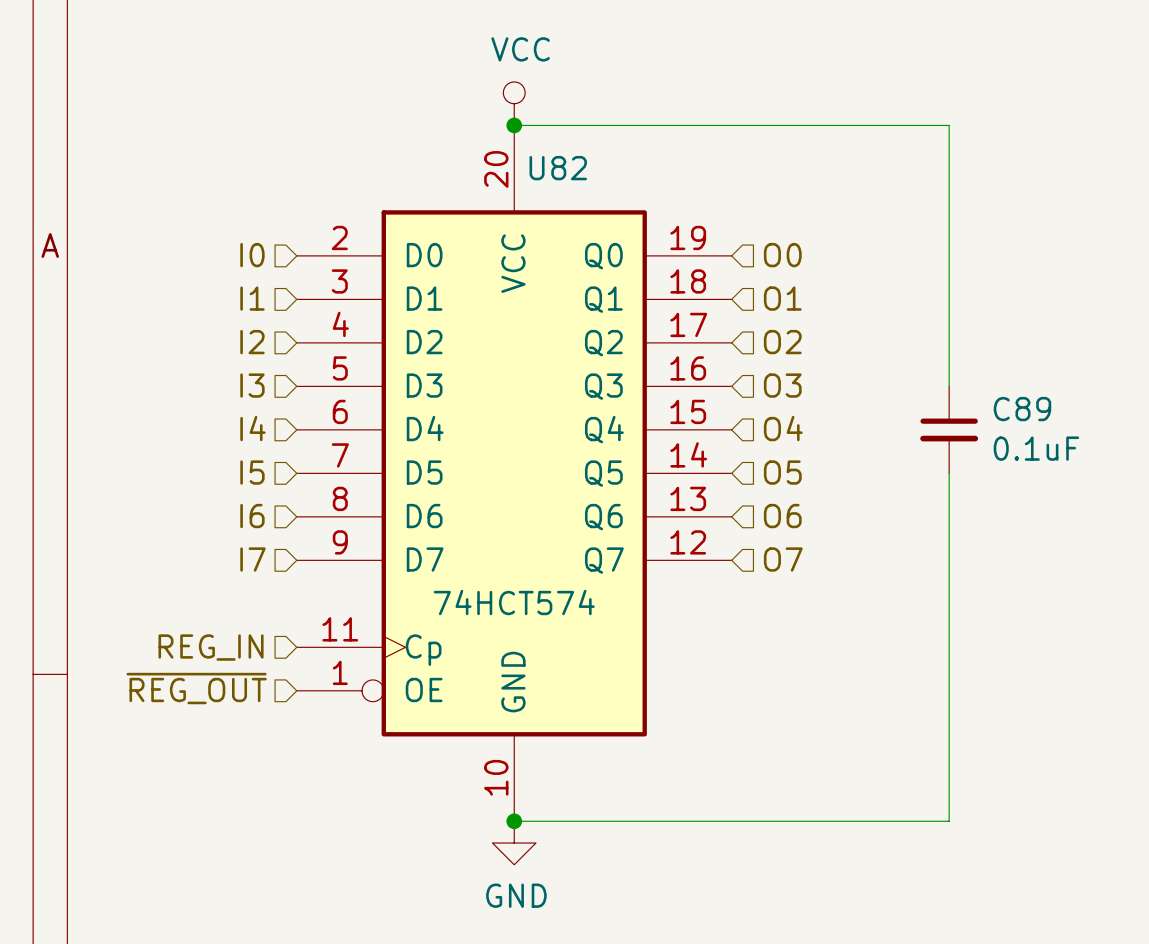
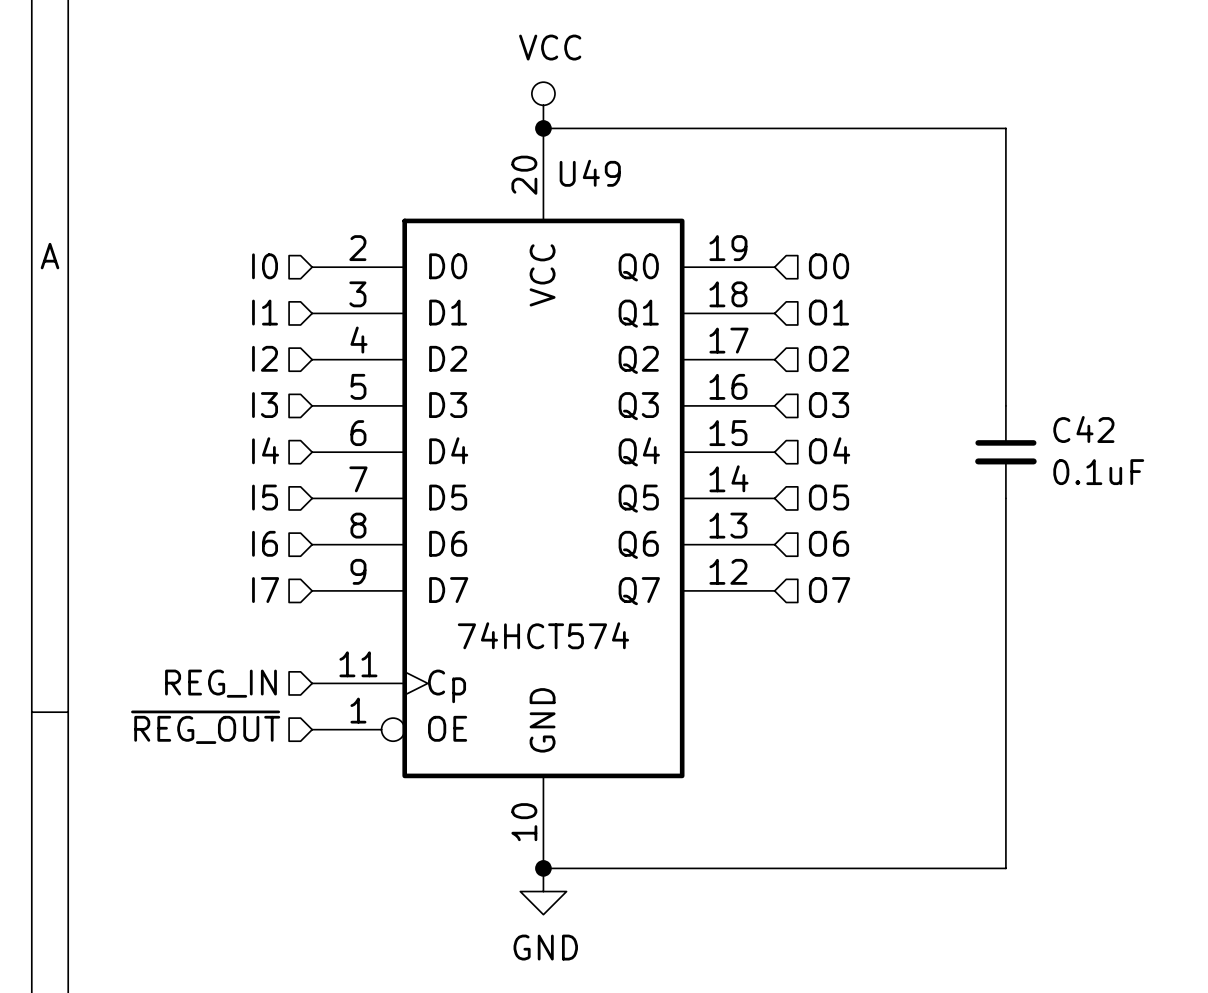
U82 name: U82 (558, 168) -> U49 (590, 173)
C89 name: C89 (1022, 409) -> C42 (1083, 429)

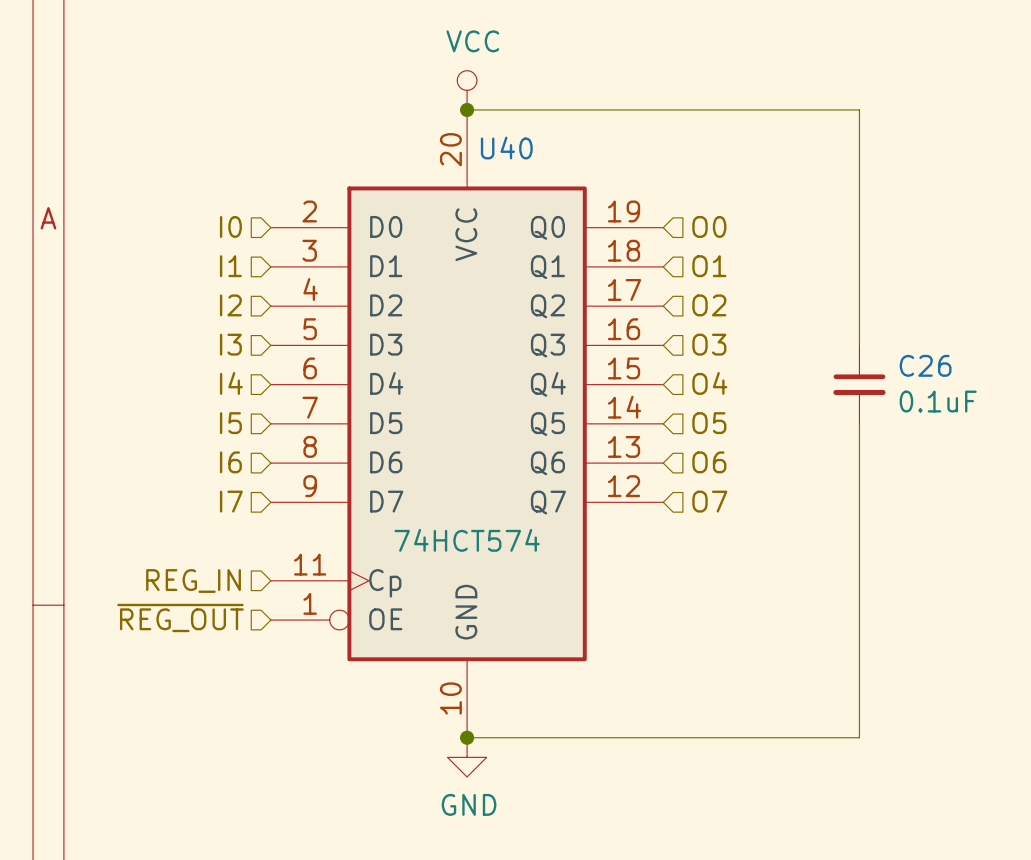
U49 name: U49 (590, 173) -> U40 (506, 148)
C42 name: C42 (1083, 429) -> C26 (925, 365)

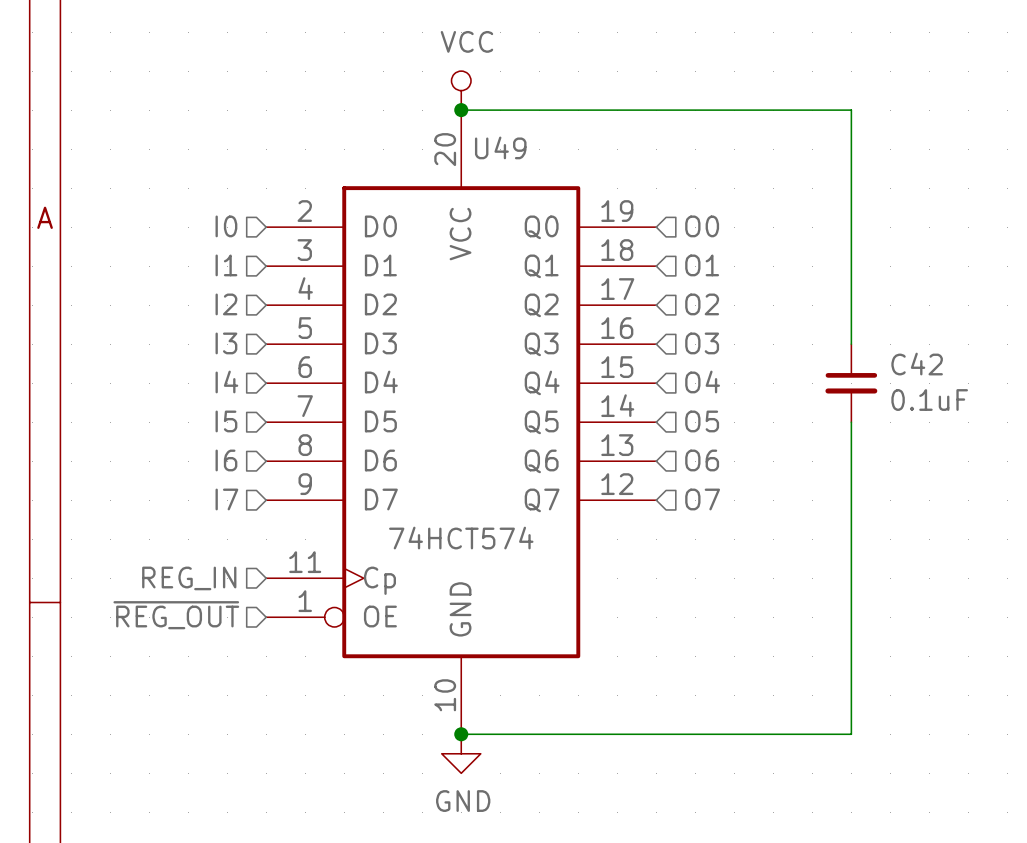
U40 name: U40 (506, 148) -> U49 (500, 147)
C26 name: C26 (925, 365) -> C42 (917, 364)

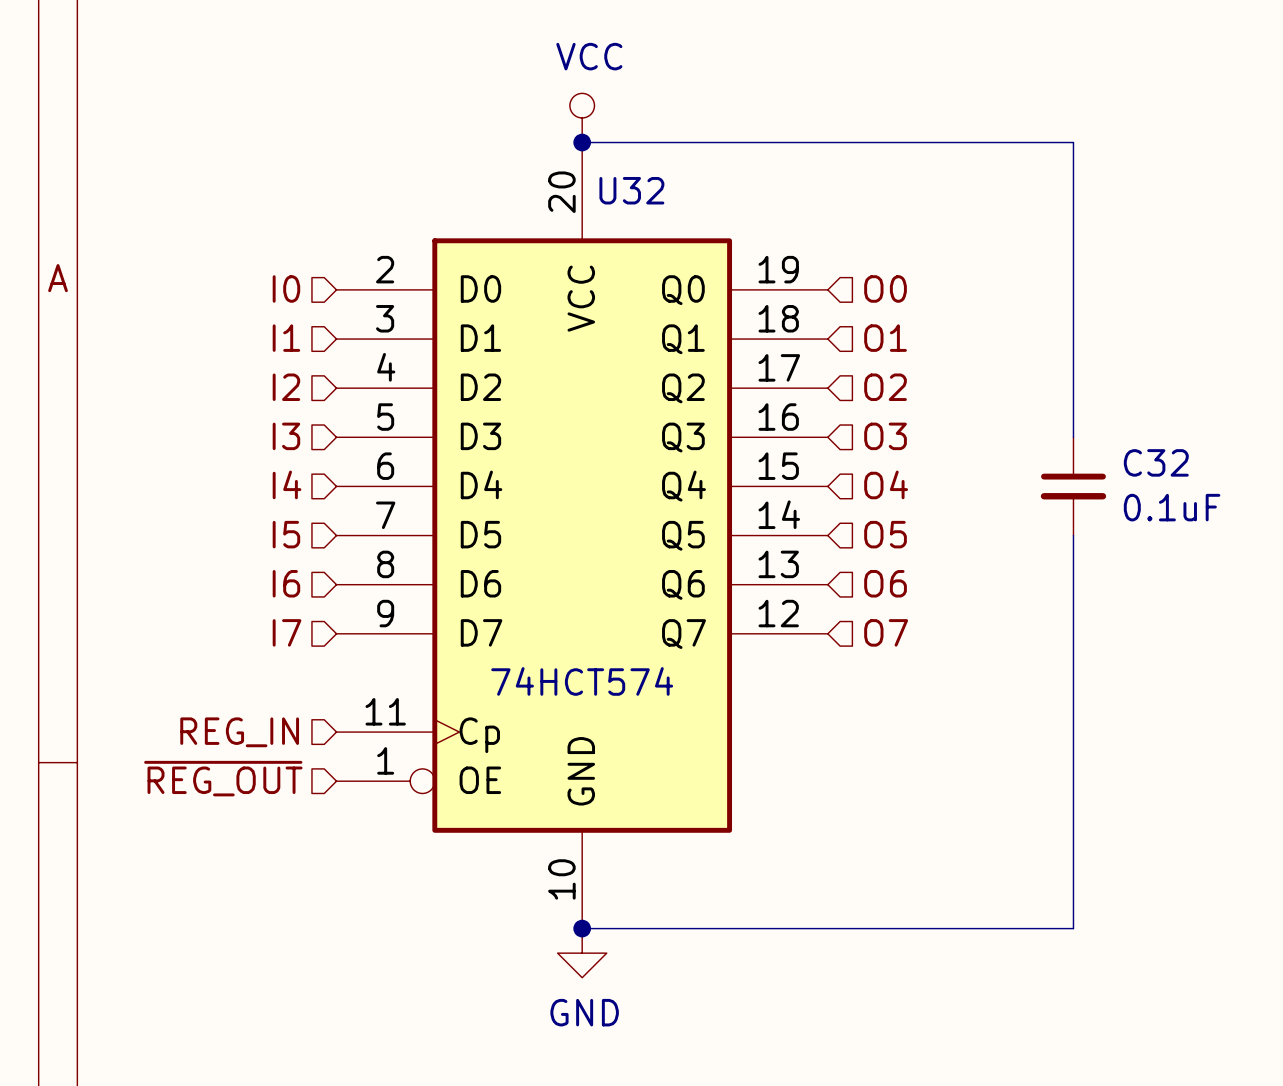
U49 name: U49 (500, 147) -> U32 (631, 190)
C42 name: C42 (917, 364) -> C32 (1156, 462)

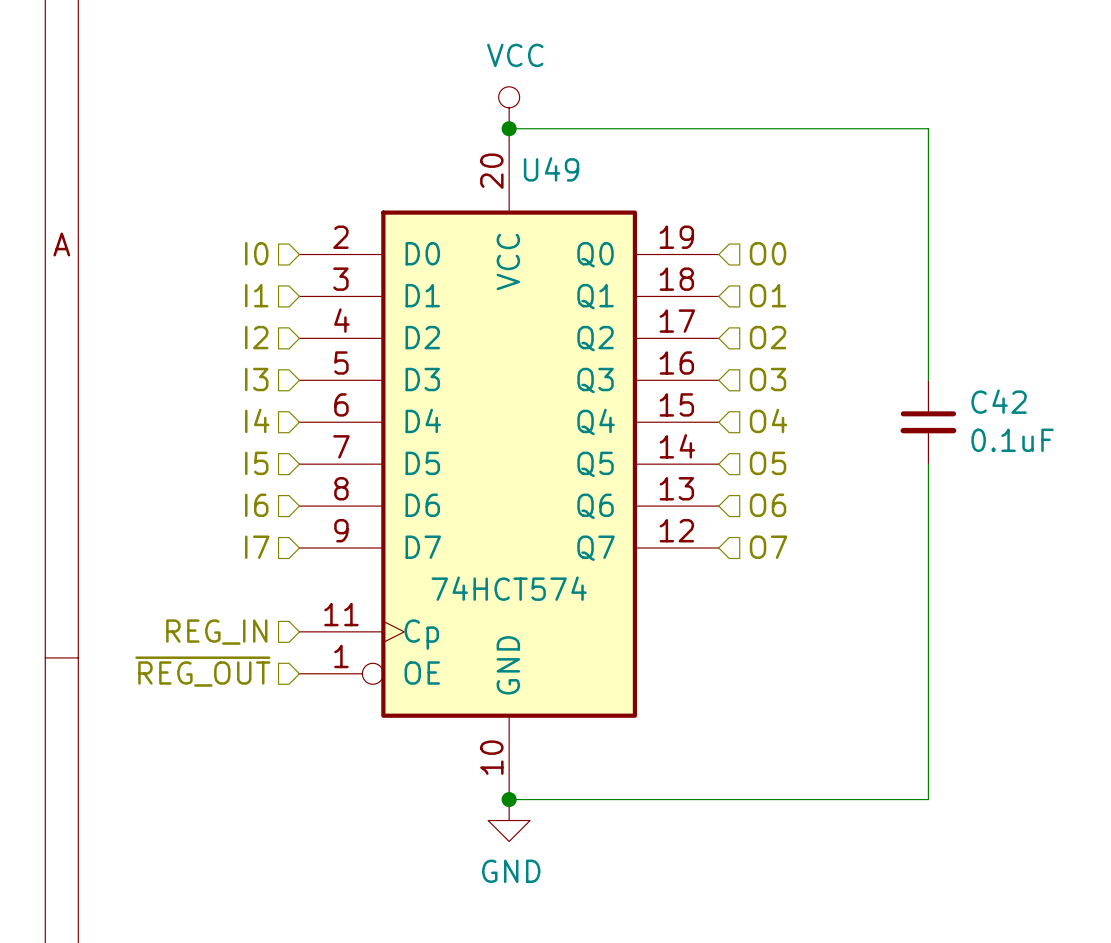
U32 name: U32 (631, 190) -> U49 (551, 169)
C32 name: C32 (1156, 462) -> C42 (999, 401)

